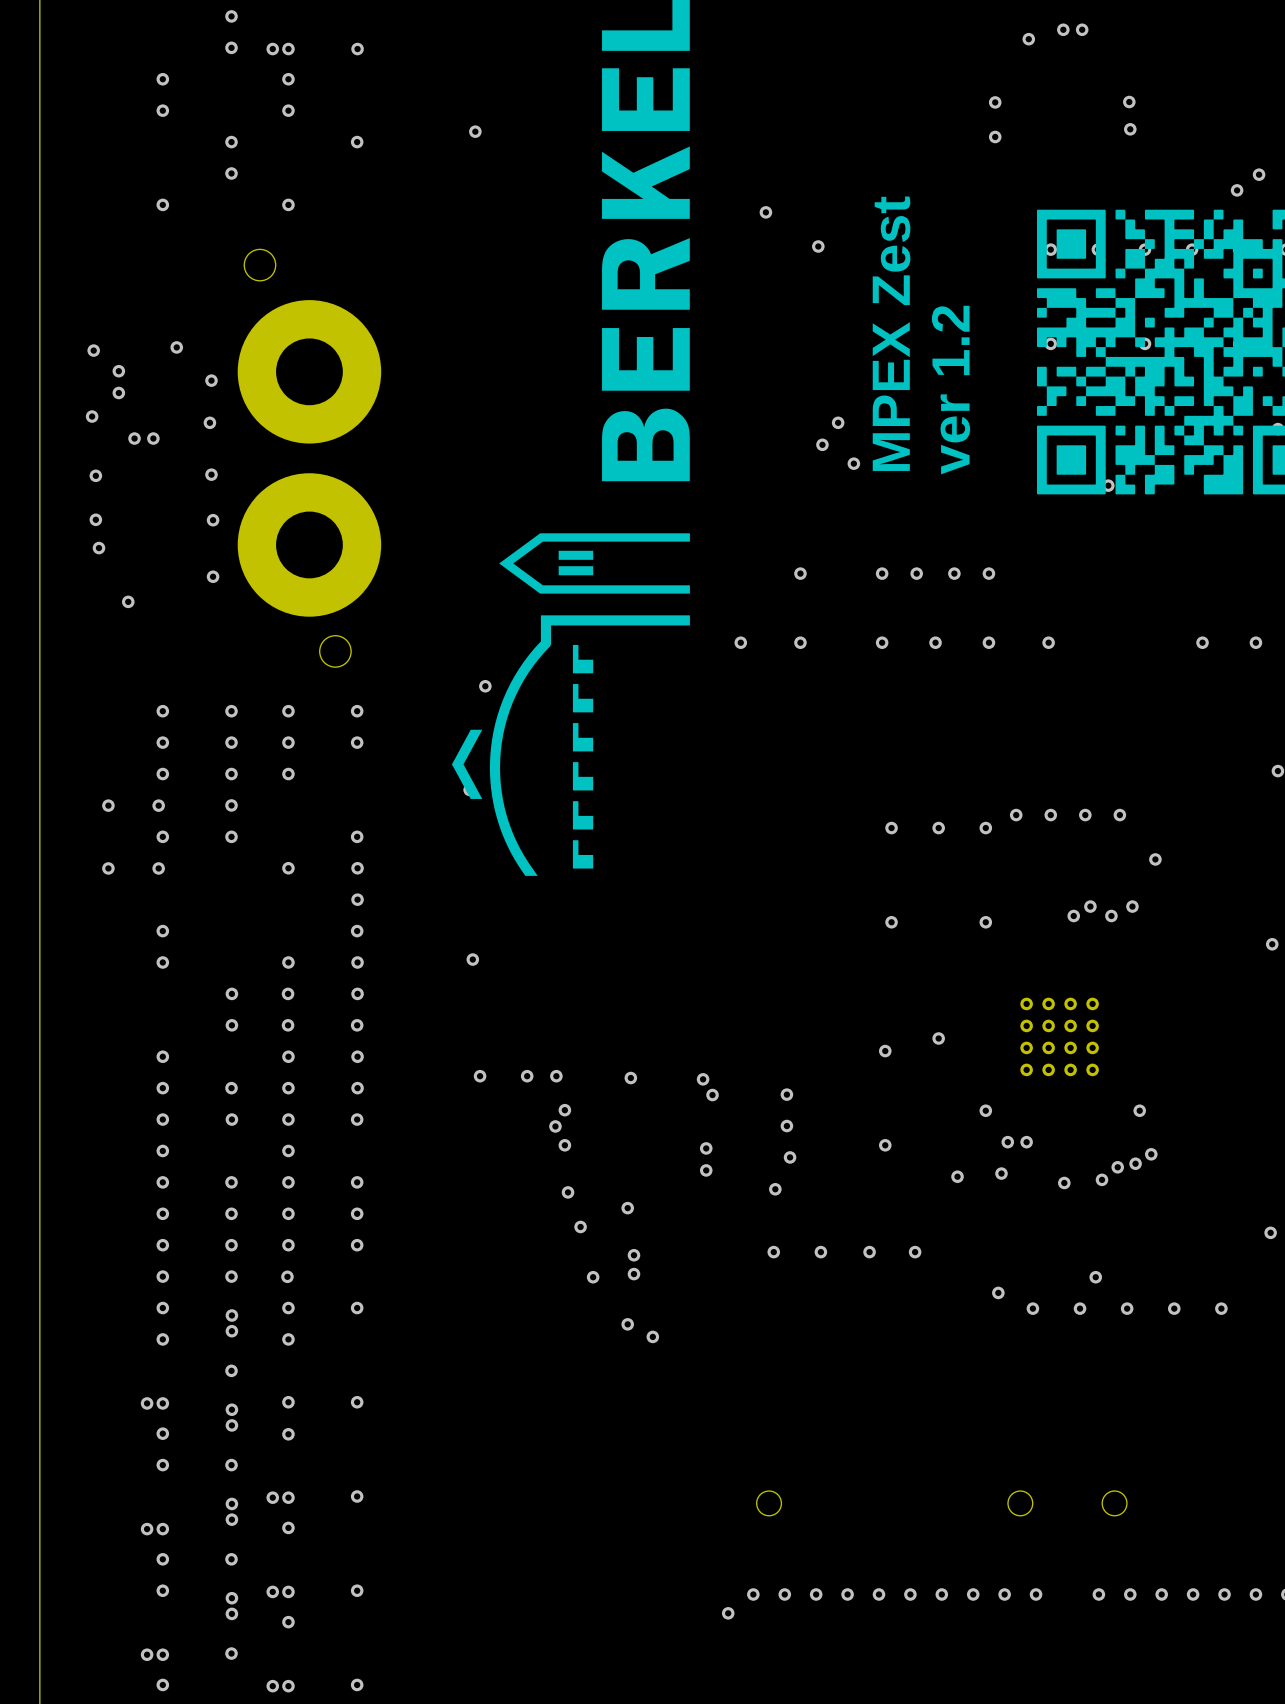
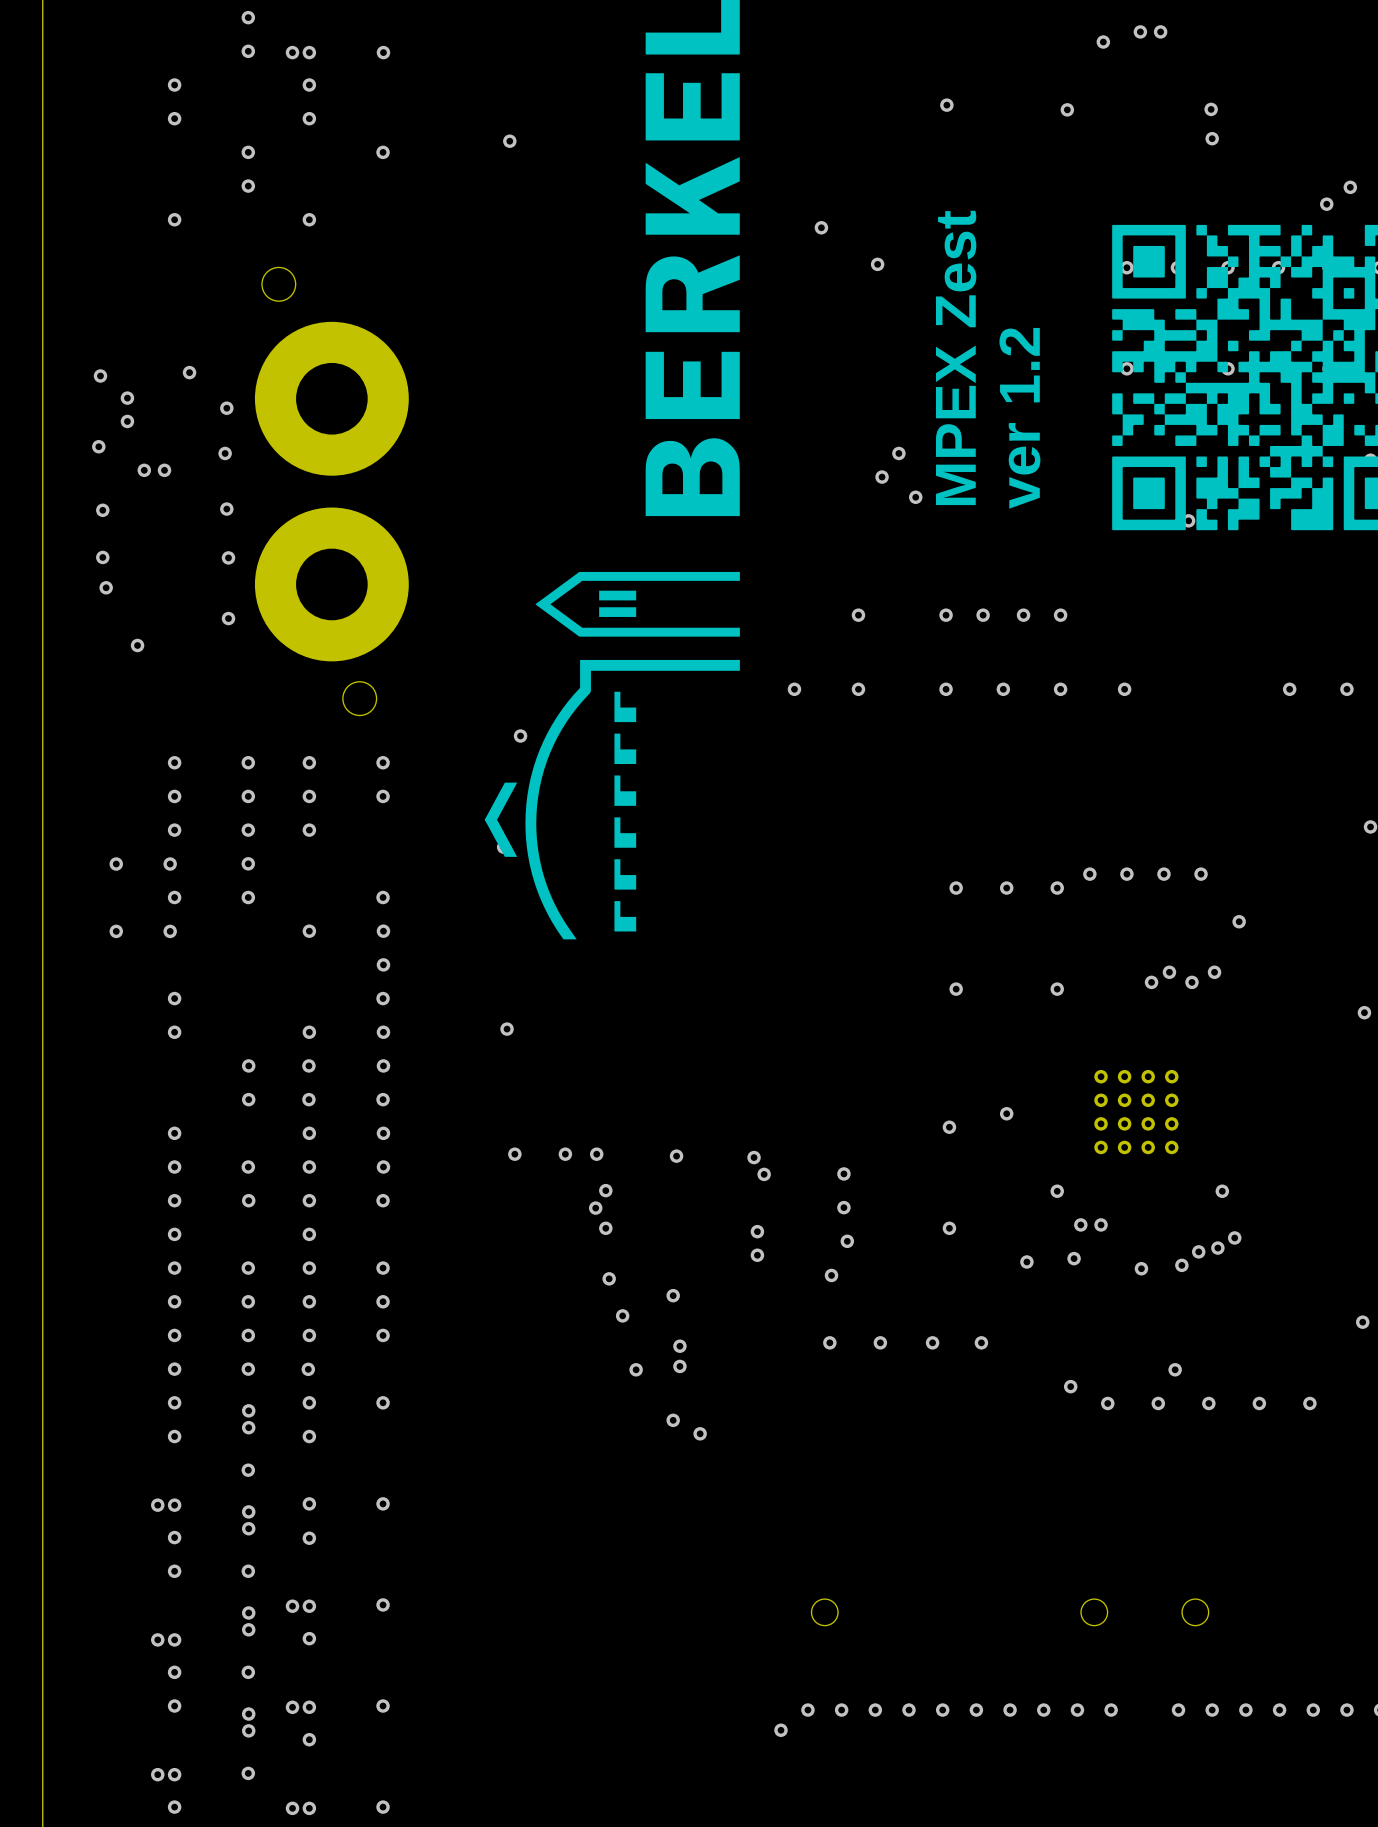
via position: (995, 136) -> (946, 105)

